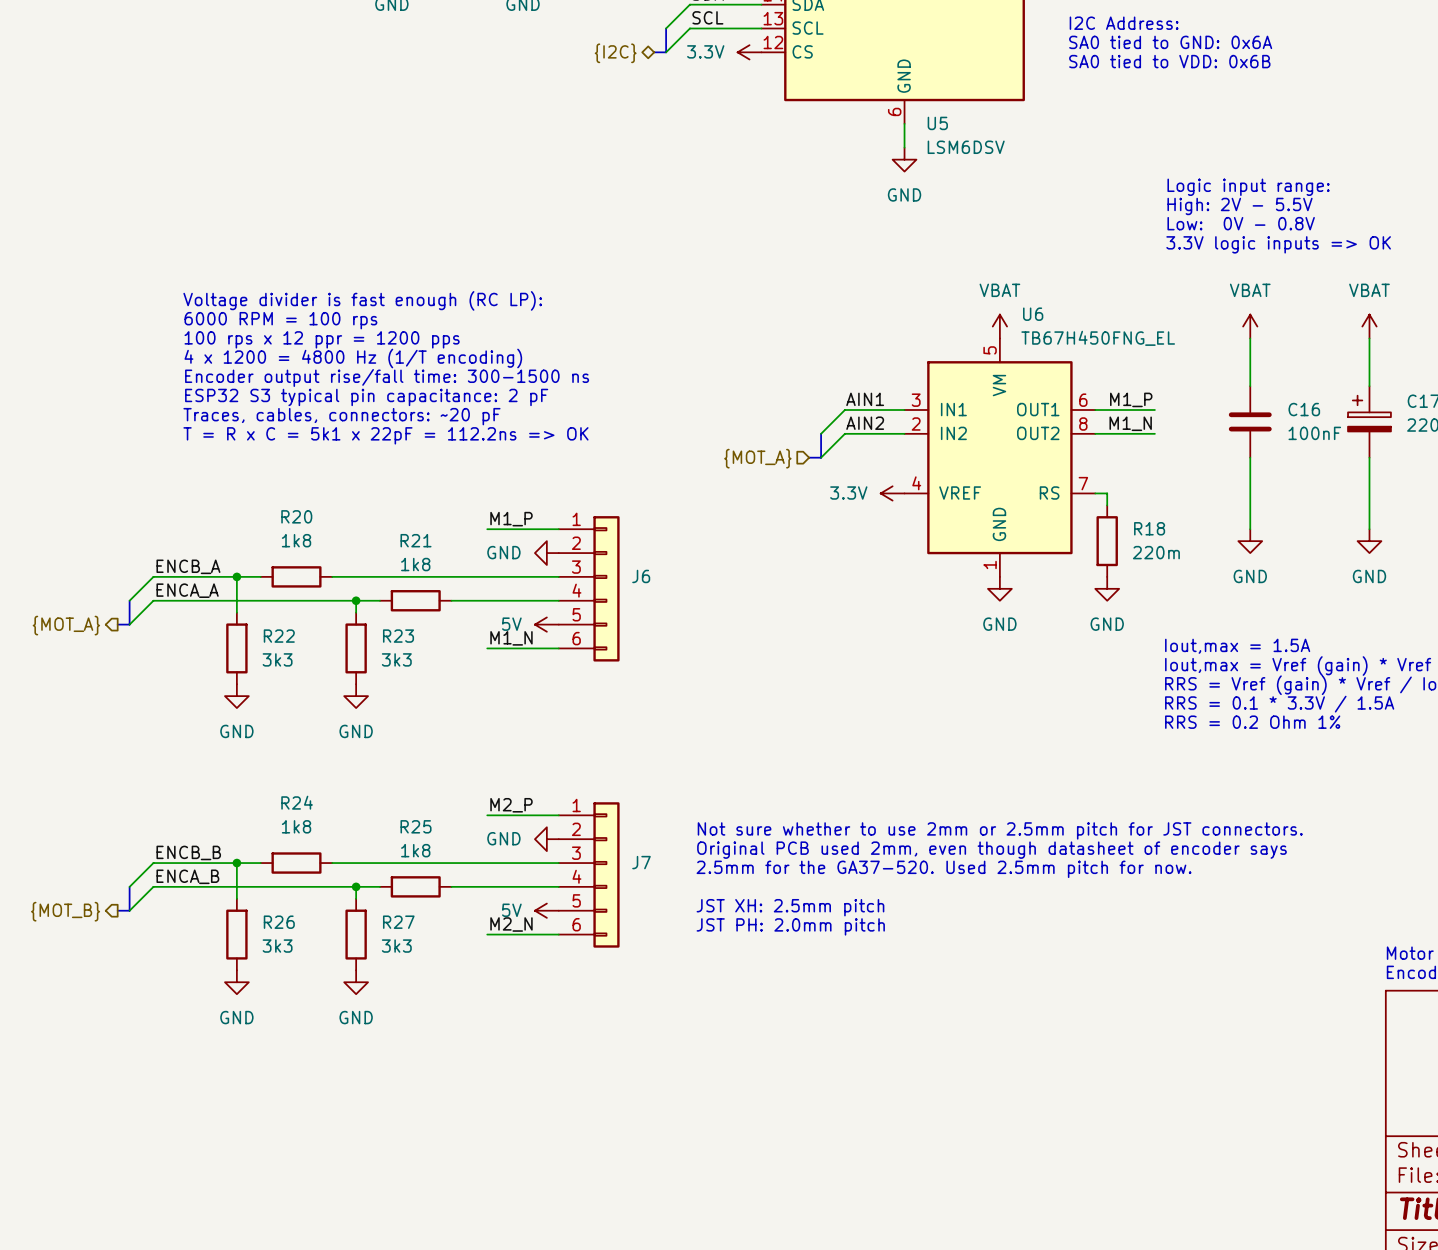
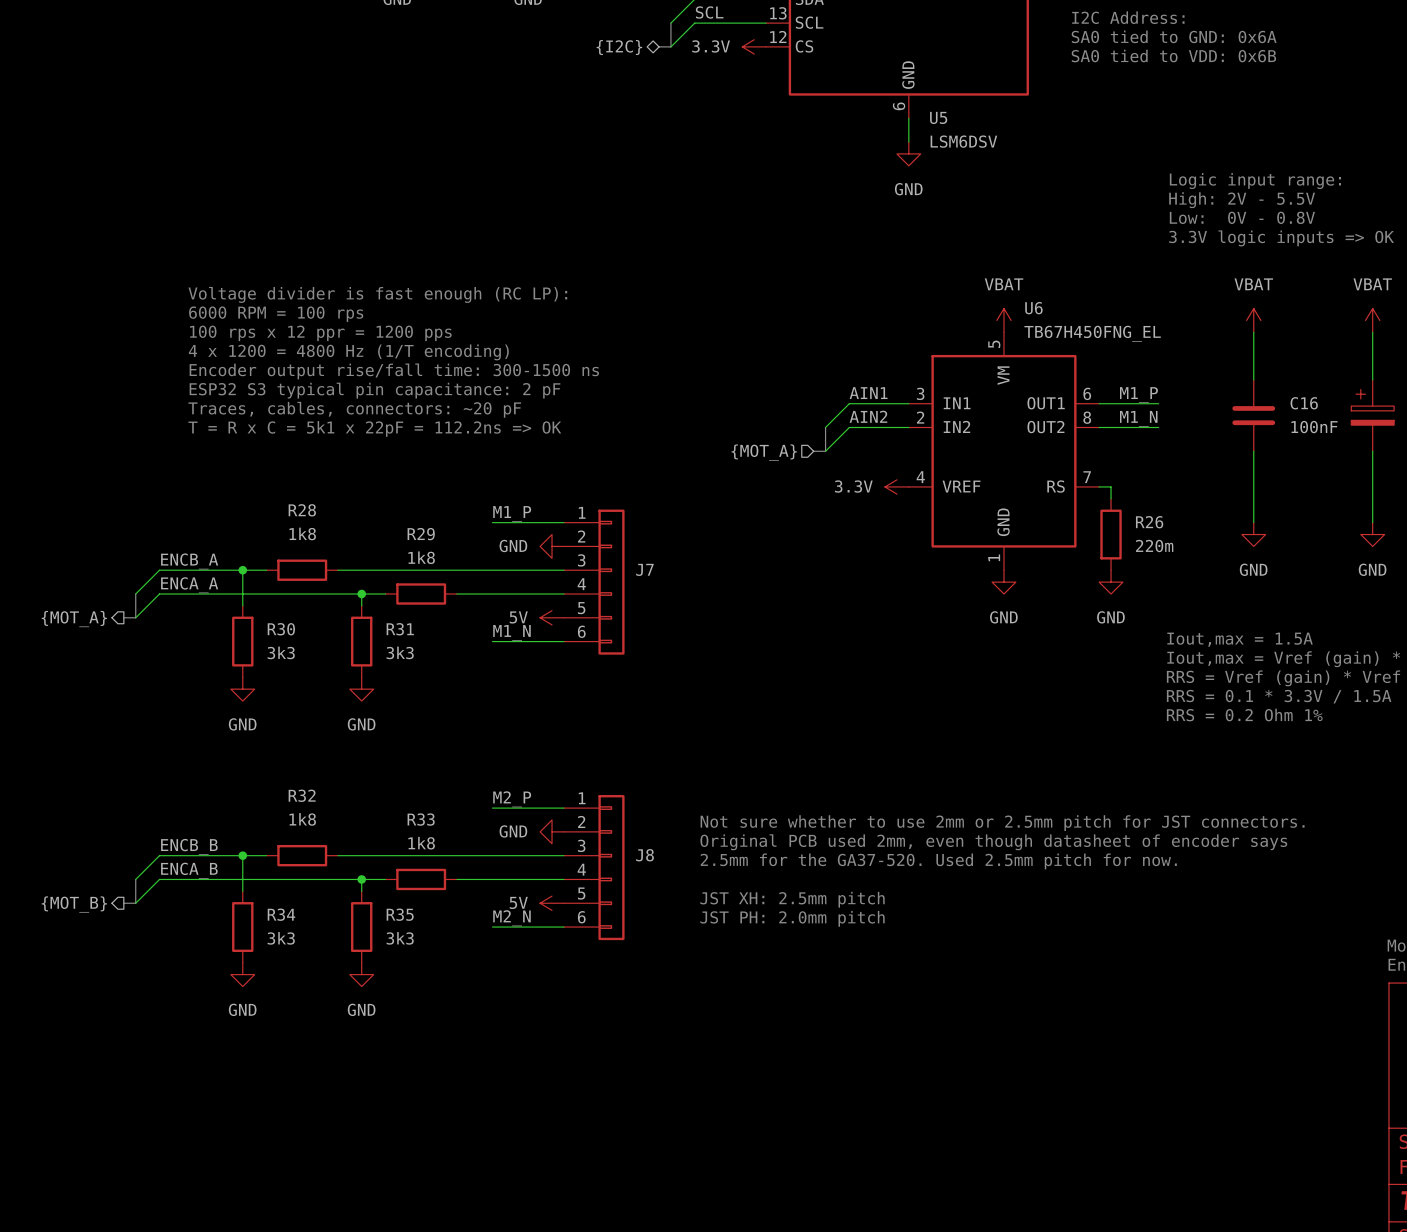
R20 name: R20 (296, 516) -> R28 (302, 510)
R18 name: R18 (1149, 528) -> R26 (1149, 522)
R21 name: R21 (416, 540) -> R29 (421, 534)
J6 name: J6 (641, 576) -> J7 (644, 569)
R22 name: R22 (279, 636) -> R30 (281, 629)
R23 name: R23 (398, 636) -> R31 (400, 629)
R24 name: R24 (297, 802) -> R32 (302, 795)
R25 name: R25 (416, 826) -> R33 (421, 819)
J7 name: J7 (641, 862) -> J8 (645, 855)
R26 name: R26 (279, 922) -> R34 (281, 914)
R27 name: R27 (398, 922) -> R35 (400, 914)

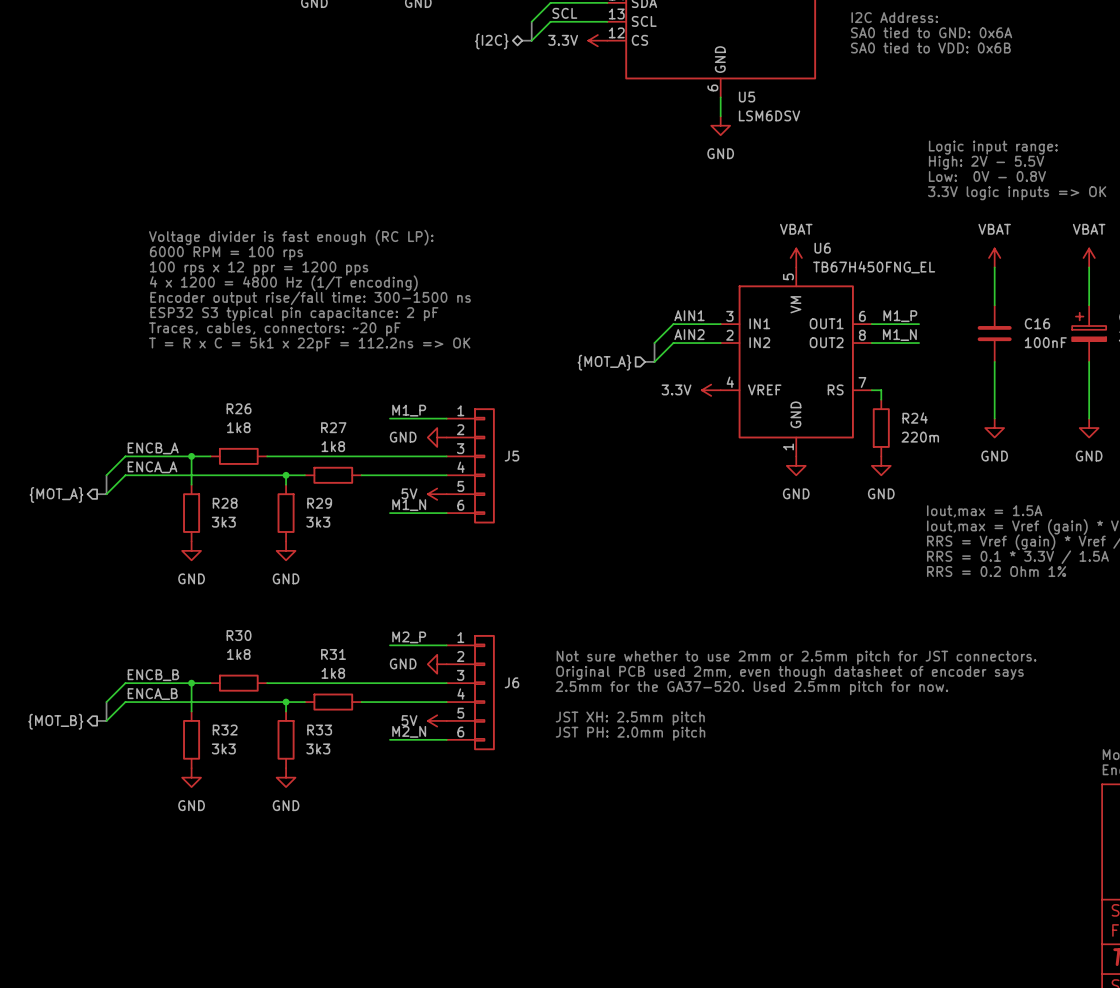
R28 name: R28 (302, 510) -> R26 (239, 408)
R26 name: R26 (1149, 522) -> R24 (915, 418)
R29 name: R29 (421, 534) -> R27 (333, 427)
J7 name: J7 (644, 569) -> J5 (511, 456)
R30 name: R30 (281, 629) -> R28 (225, 503)
R31 name: R31 (400, 629) -> R29 (319, 503)
R32 name: R32 (302, 795) -> R30 (239, 635)
R33 name: R33 (421, 819) -> R31 (333, 654)
J8 name: J8 (645, 855) -> J6 (511, 682)
R34 name: R34 (281, 914) -> R32 (225, 730)
R35 name: R35 (400, 914) -> R33 (319, 730)

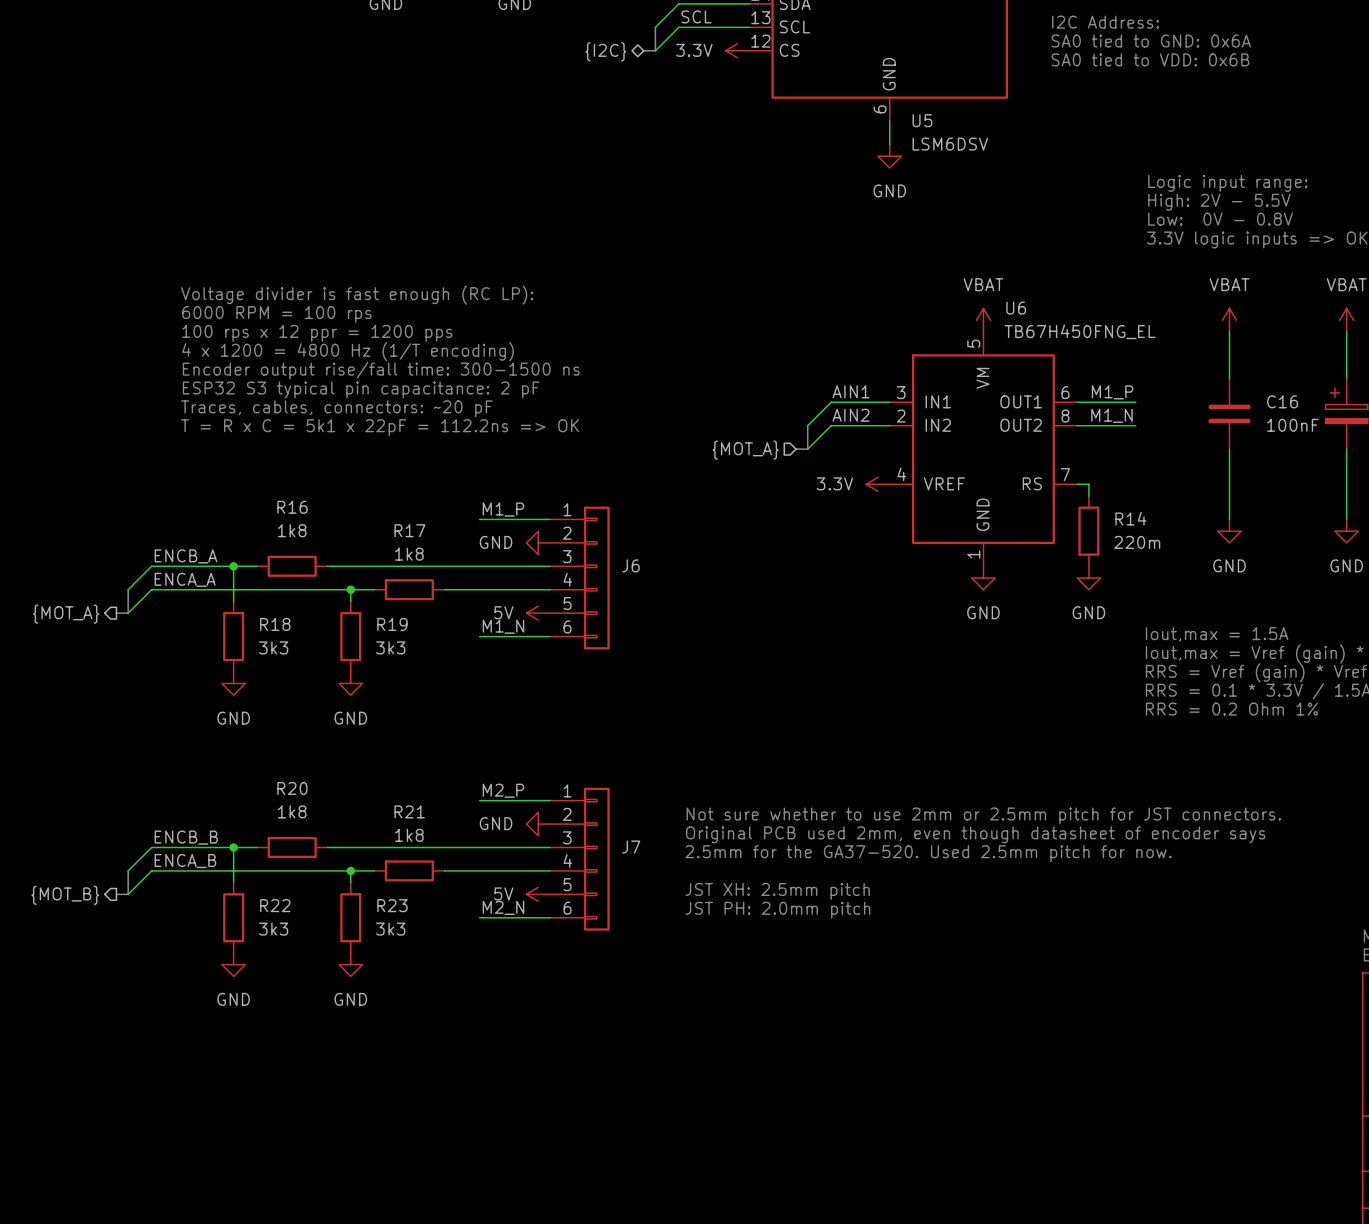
R26 name: R26 (239, 408) -> R16 (292, 507)
R24 name: R24 (915, 418) -> R14 (1130, 518)
R27 name: R27 (333, 427) -> R17 (409, 530)
J5 name: J5 (511, 456) -> J6 (630, 565)
R28 name: R28 (225, 503) -> R18 (275, 624)
R29 name: R29 (319, 503) -> R19 (392, 624)
R30 name: R30 (239, 635) -> R20 (292, 788)
R31 name: R31 (333, 654) -> R21 (409, 811)
J6 name: J6 (511, 682) -> J7 (631, 847)
R32 name: R32 (225, 730) -> R22 (275, 905)
R33 name: R33 (319, 730) -> R23 (392, 905)

